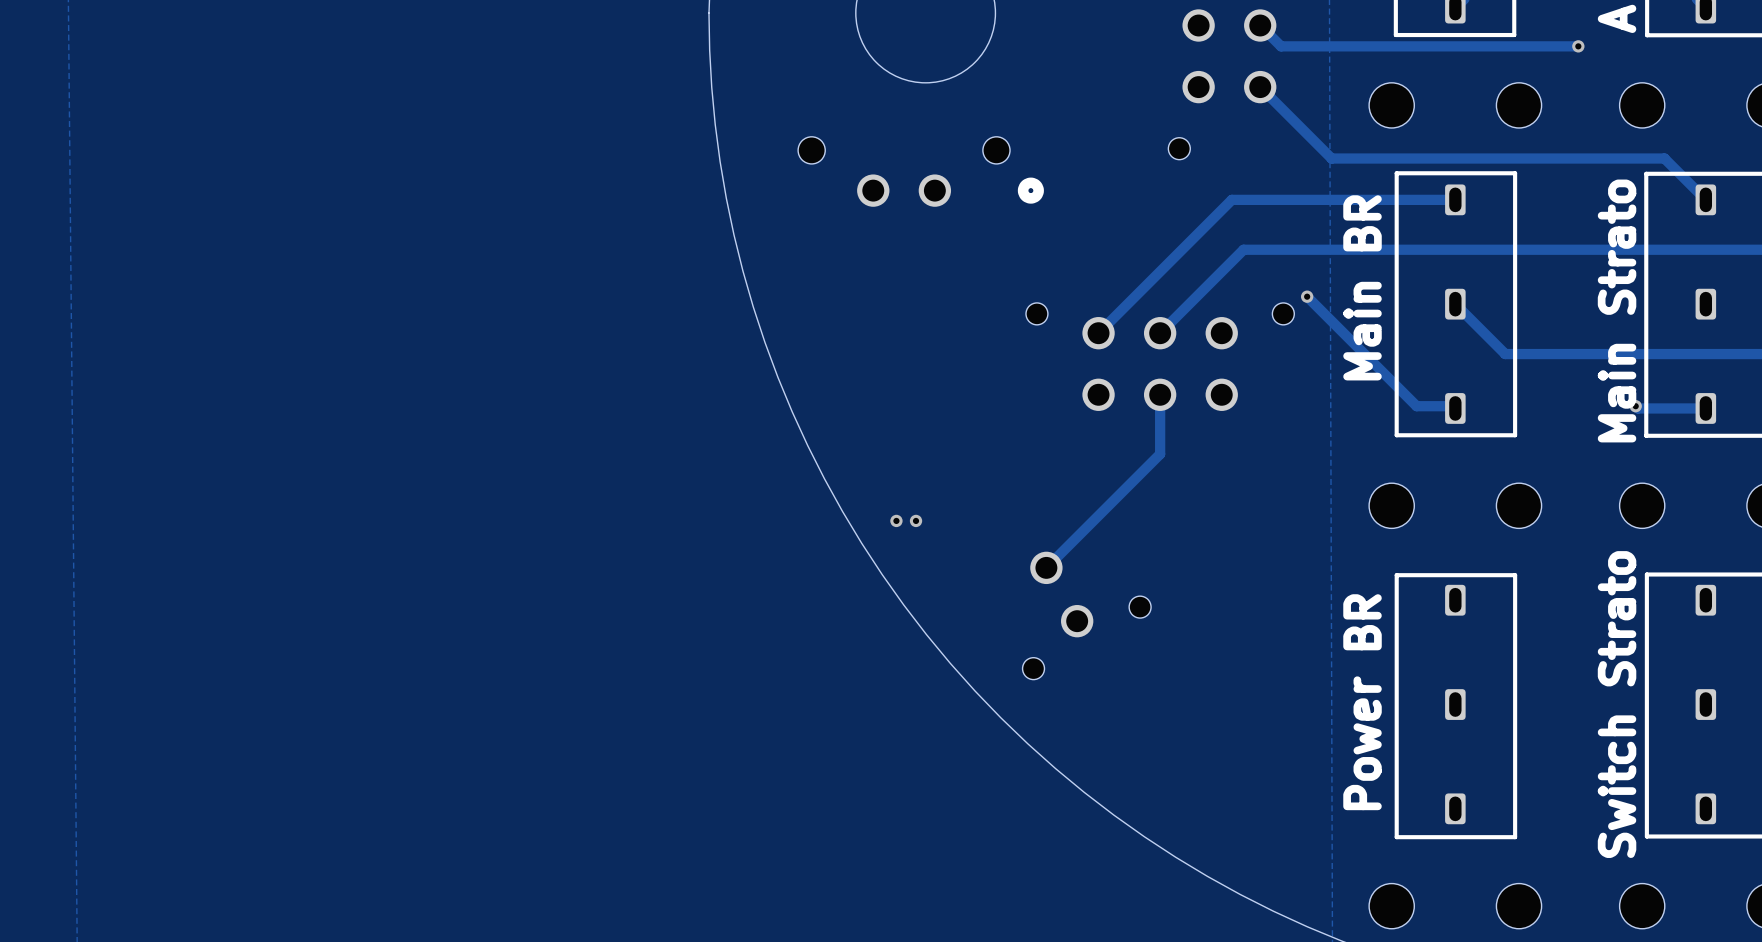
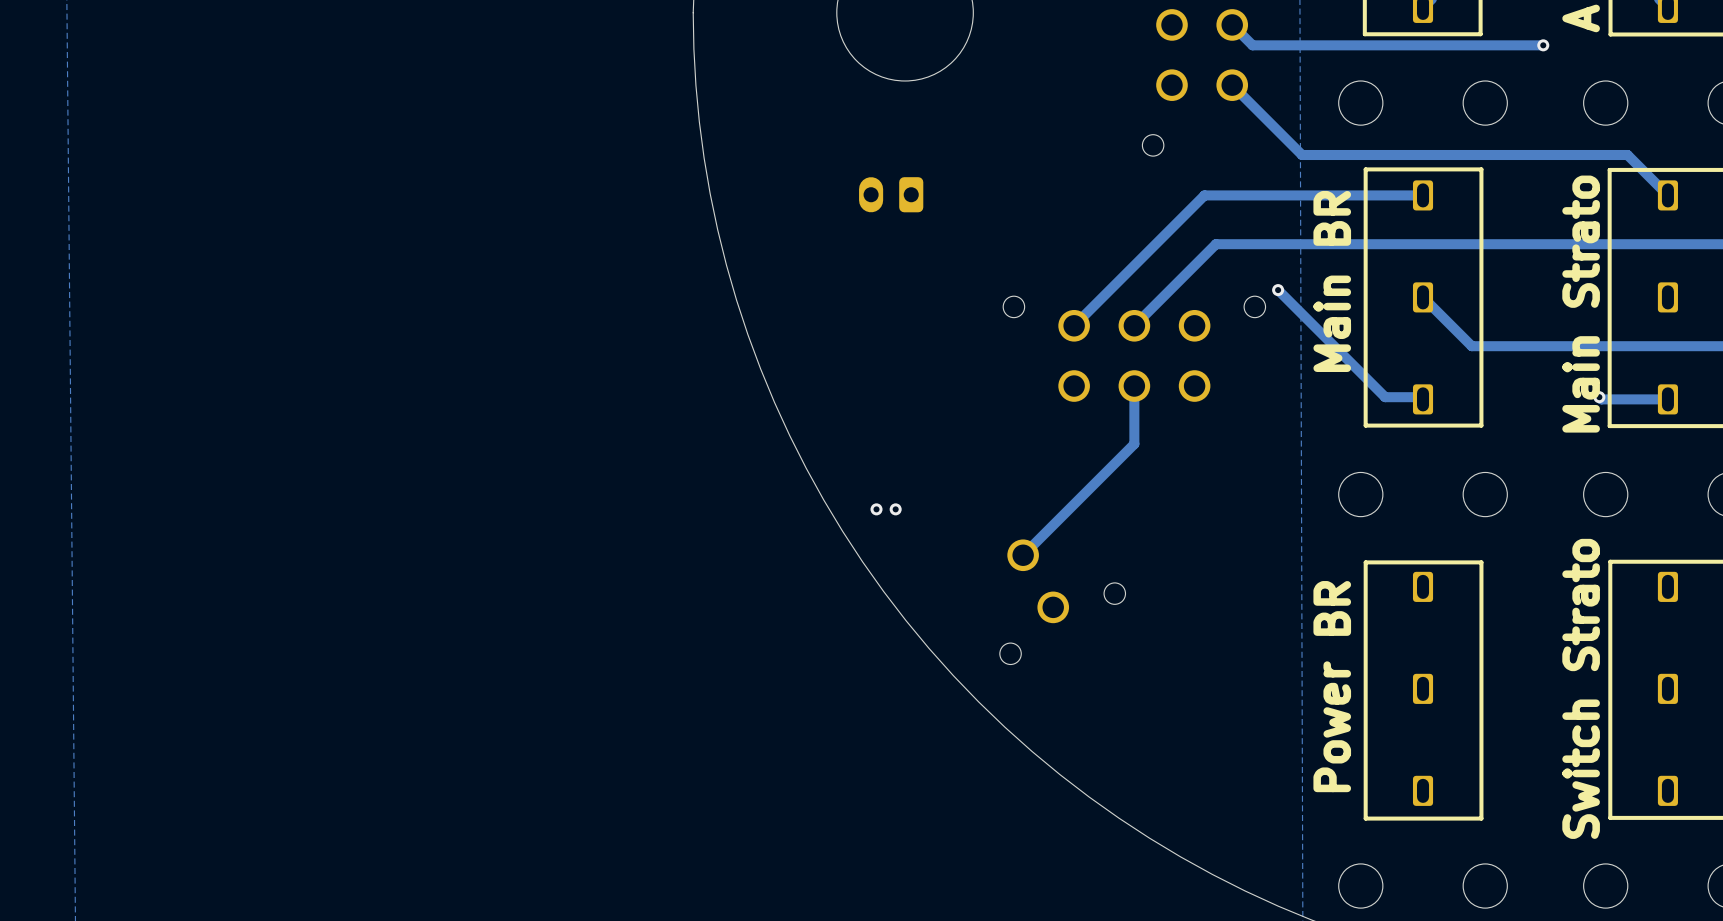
part: (921, 171) -> none
part: none -> (891, 194)

